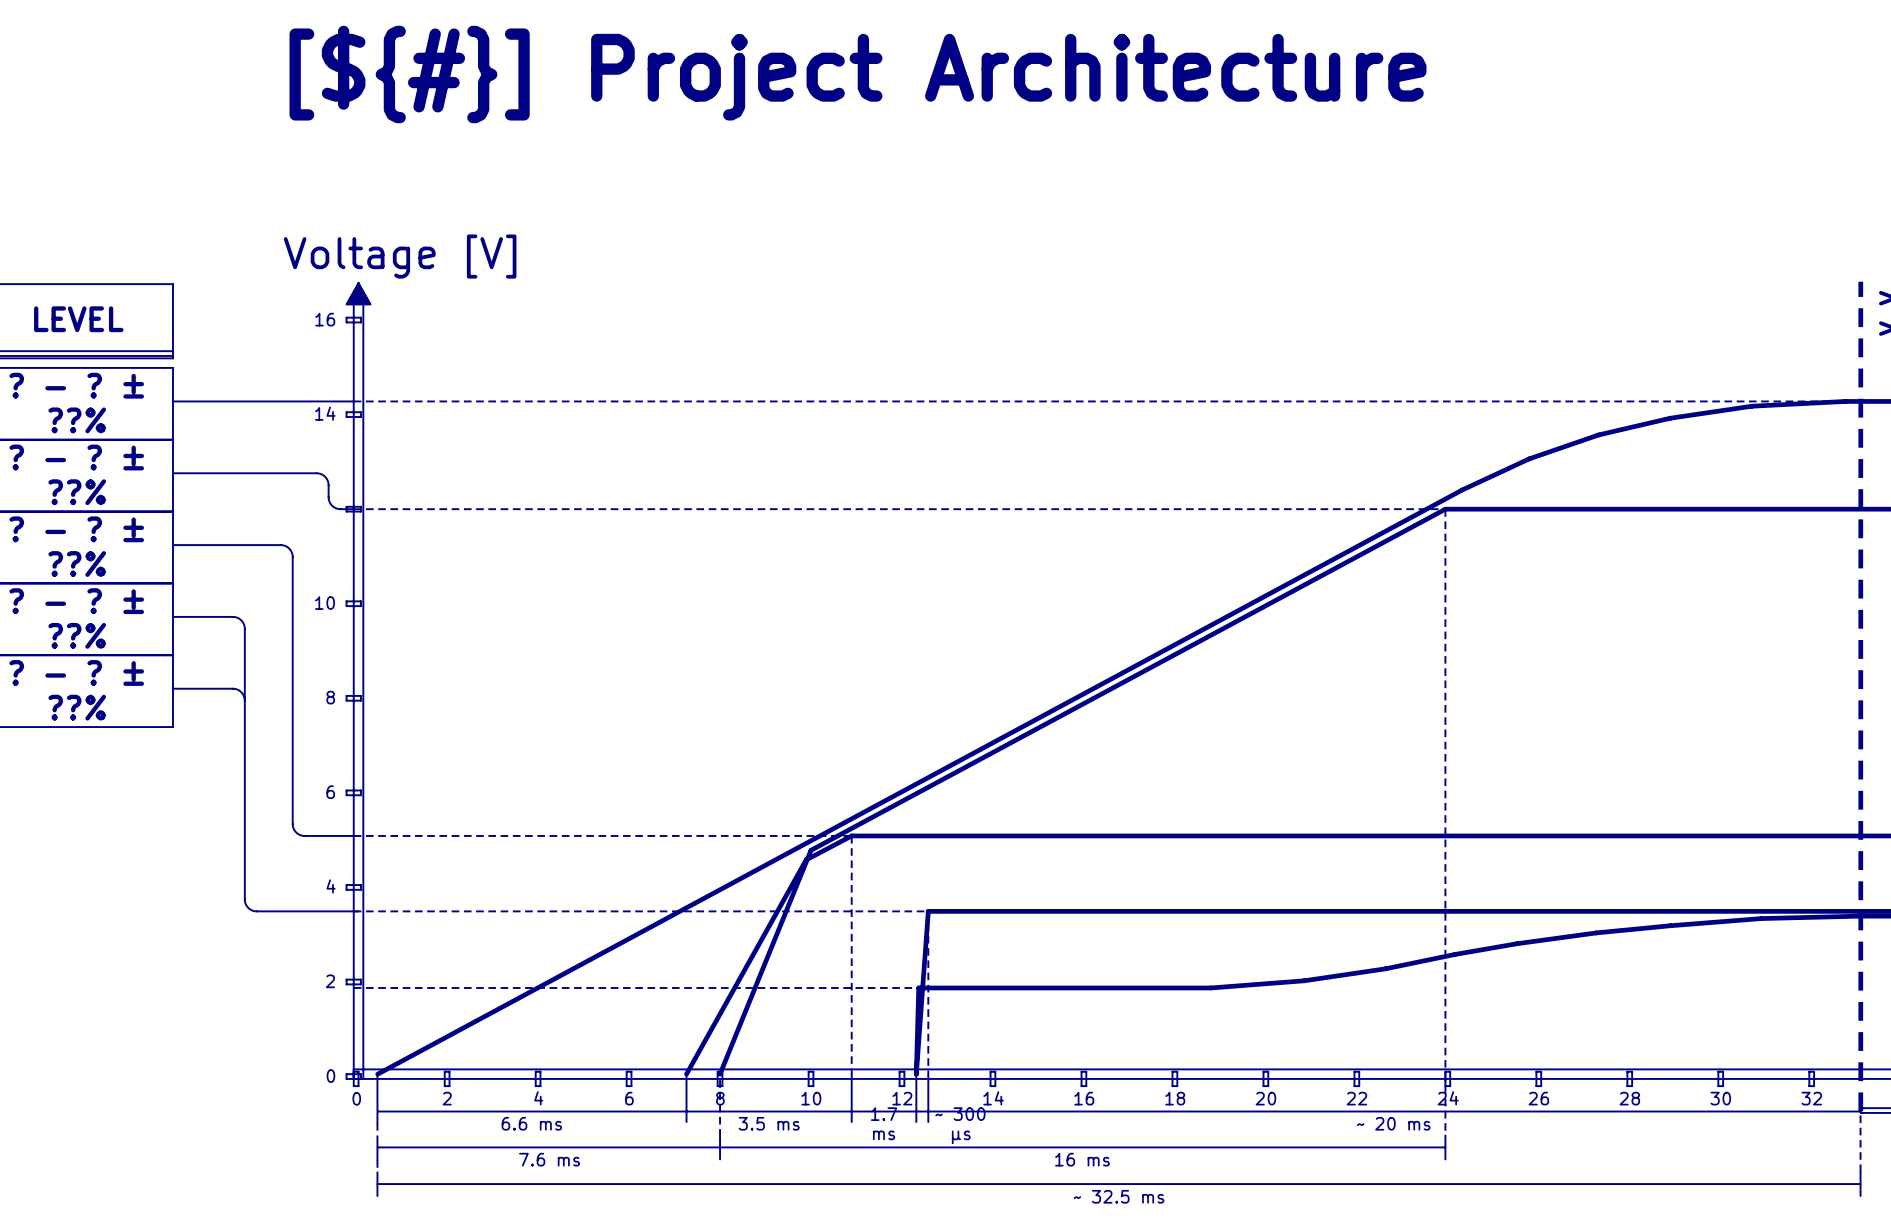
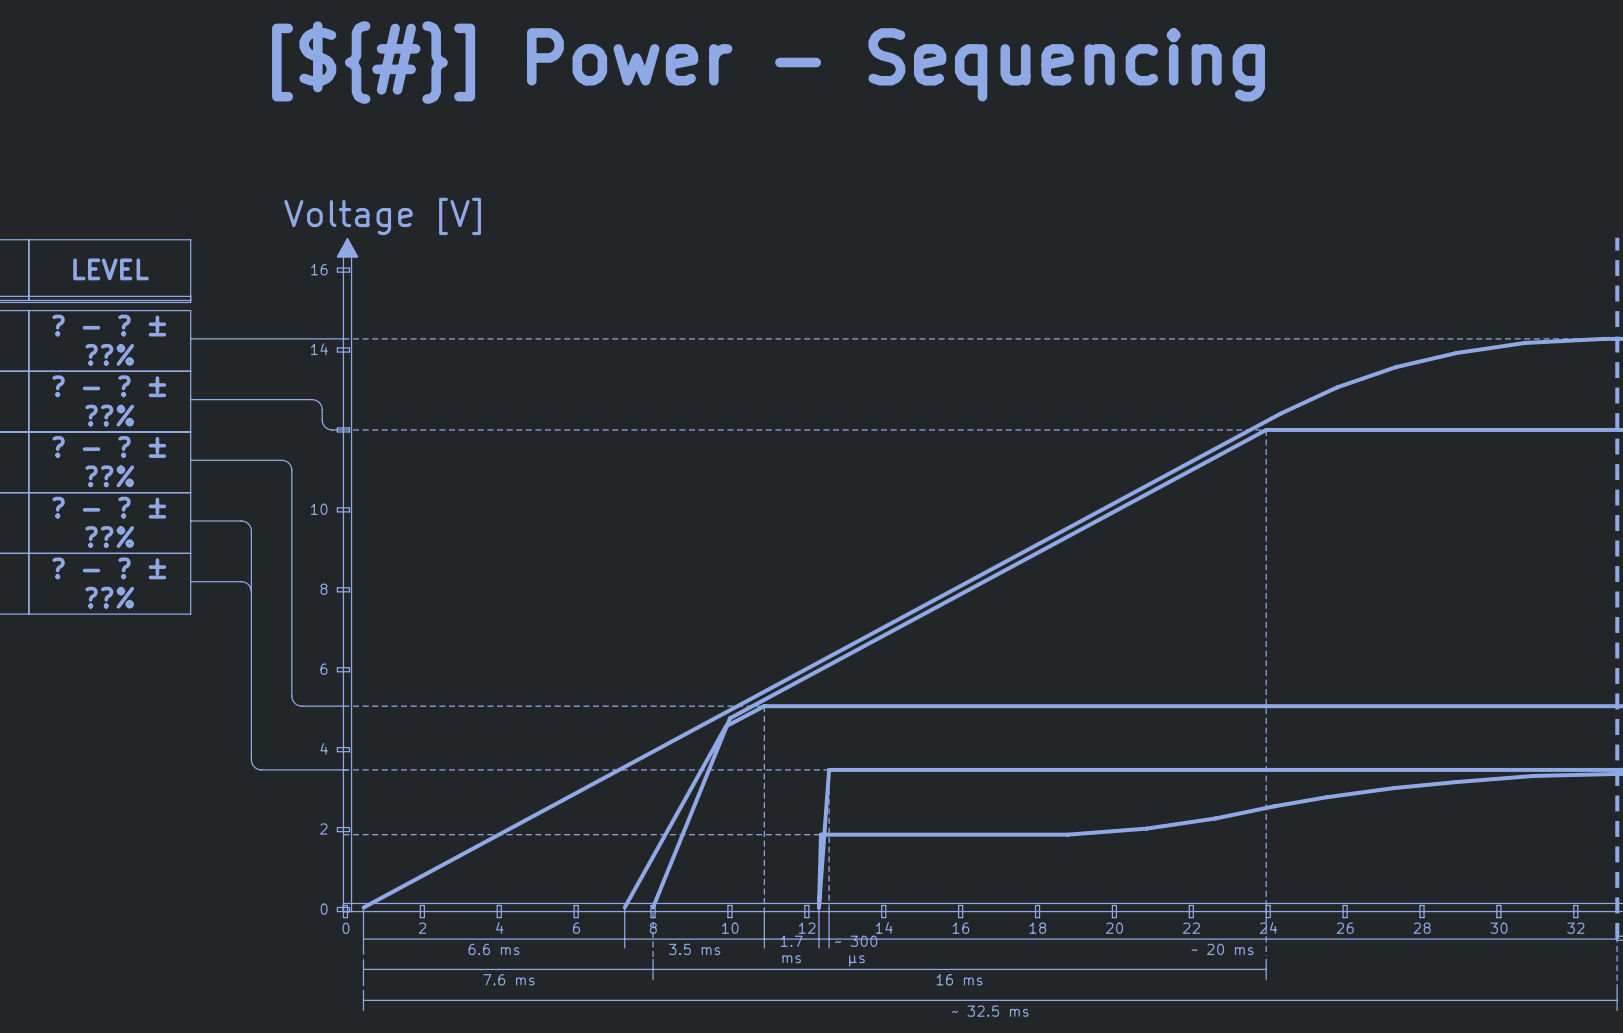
text: [${#}] Project Architecture (857, 74) -> [${#}] Power - Sequencing (768, 62)

